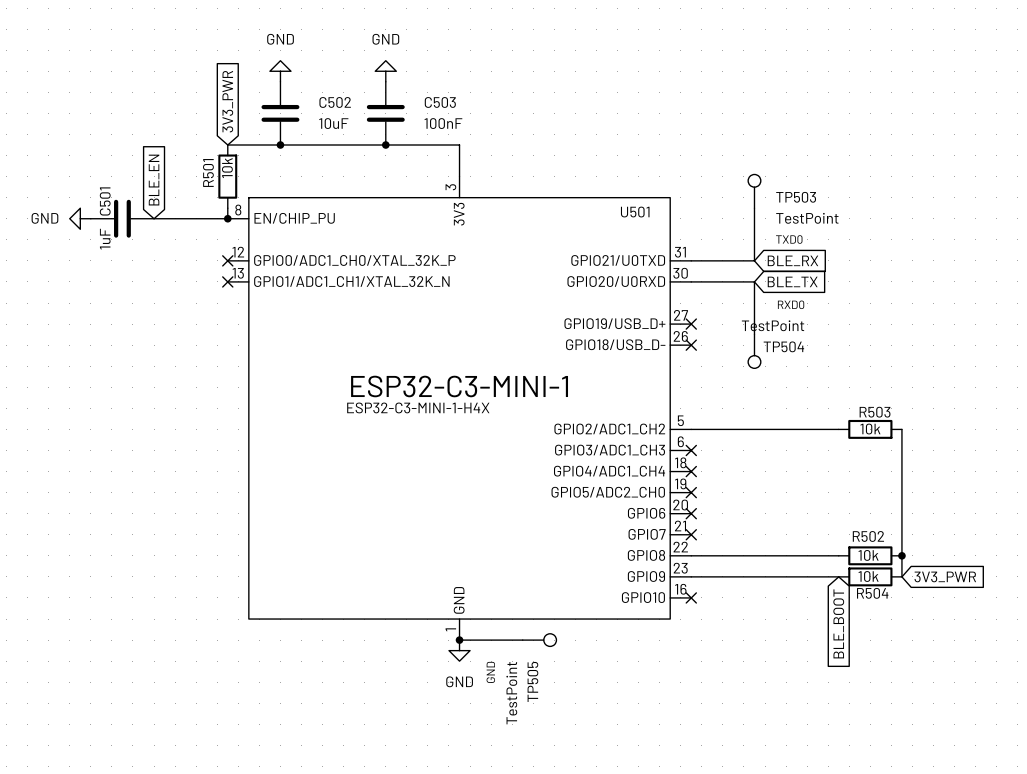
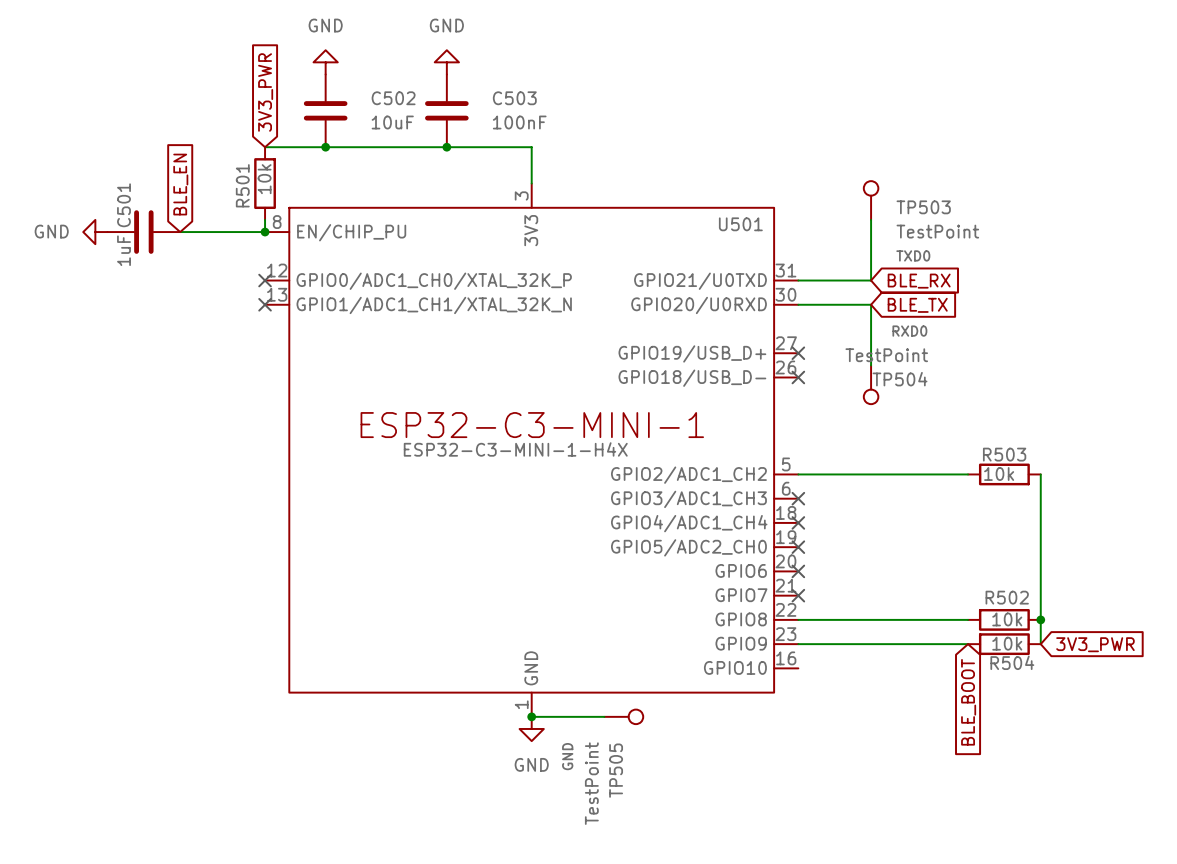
no-connect mark: (691, 597) -> none

